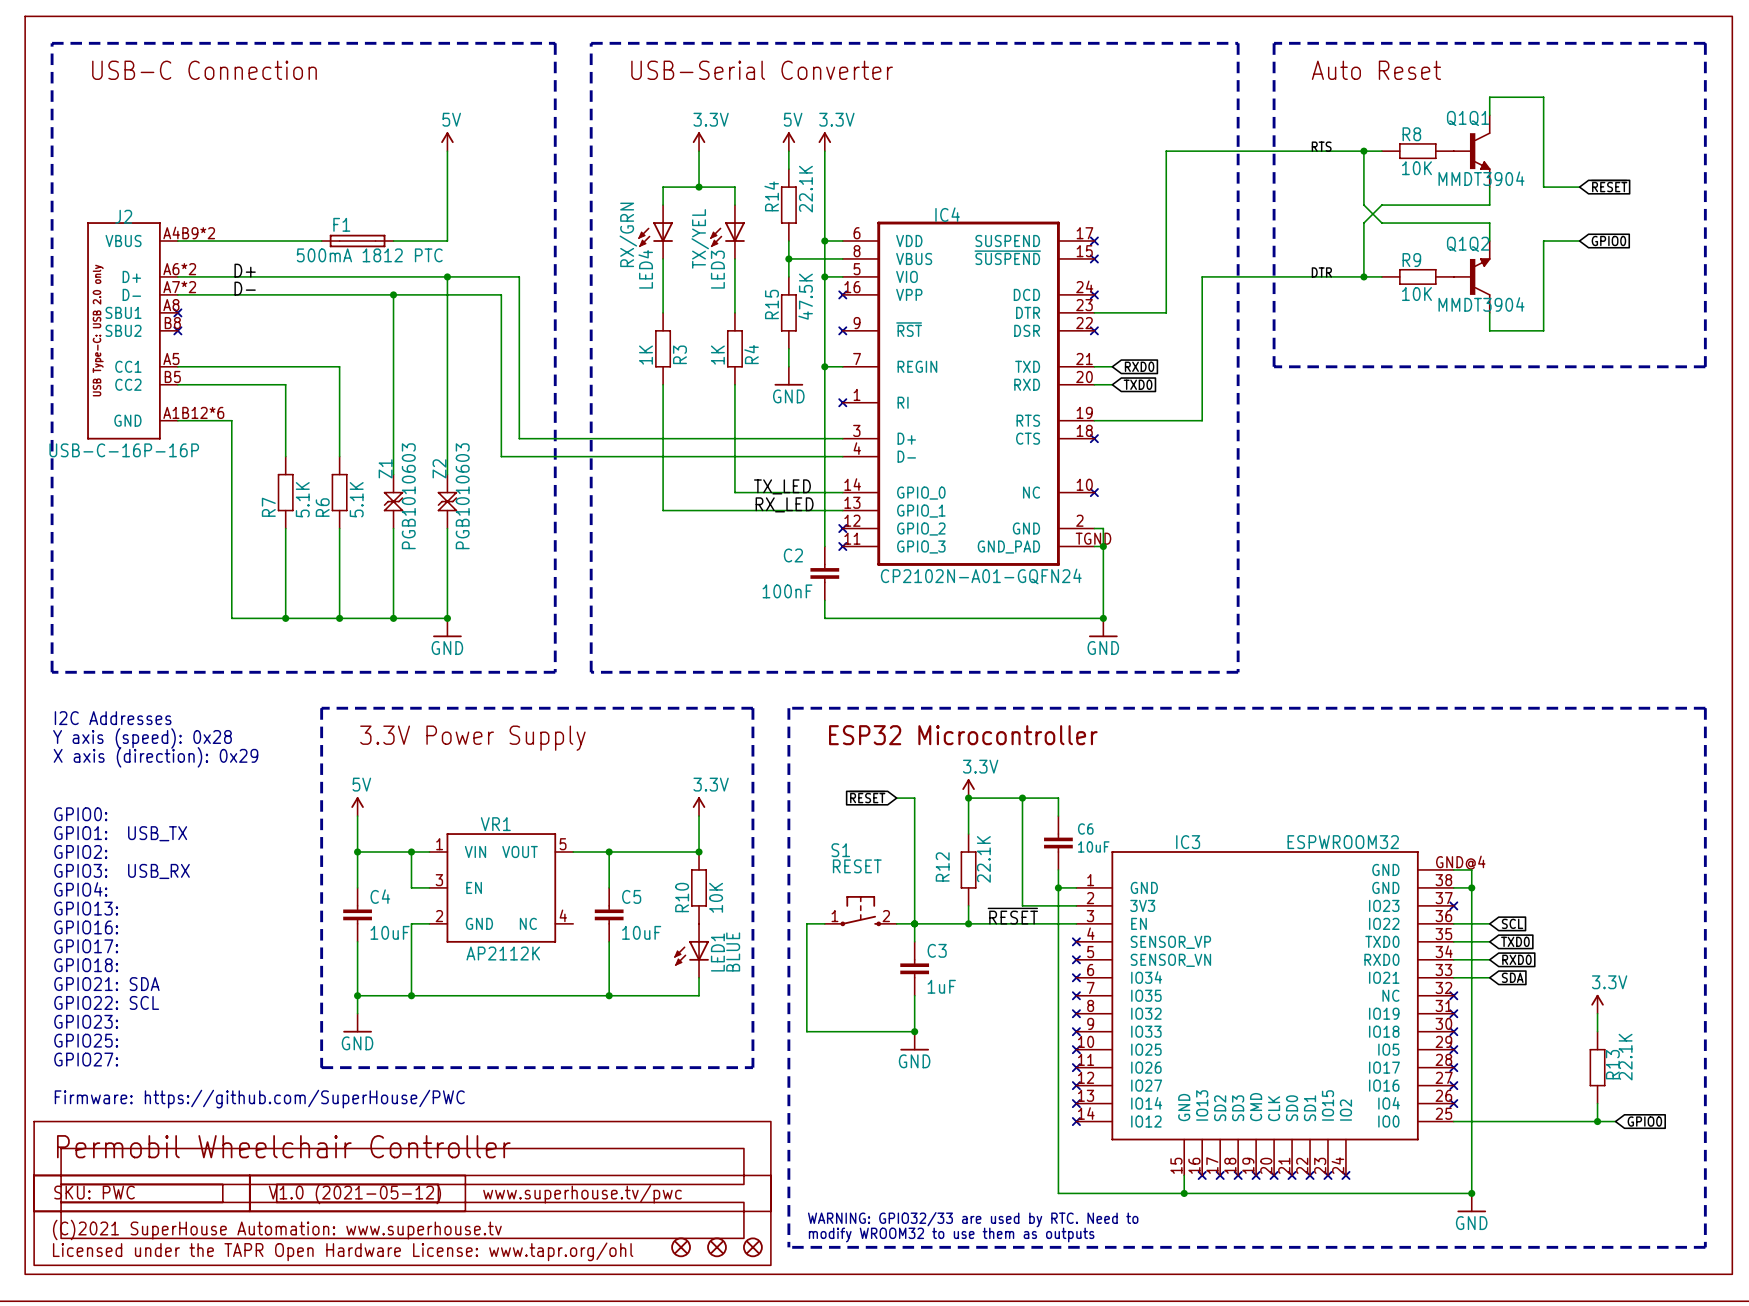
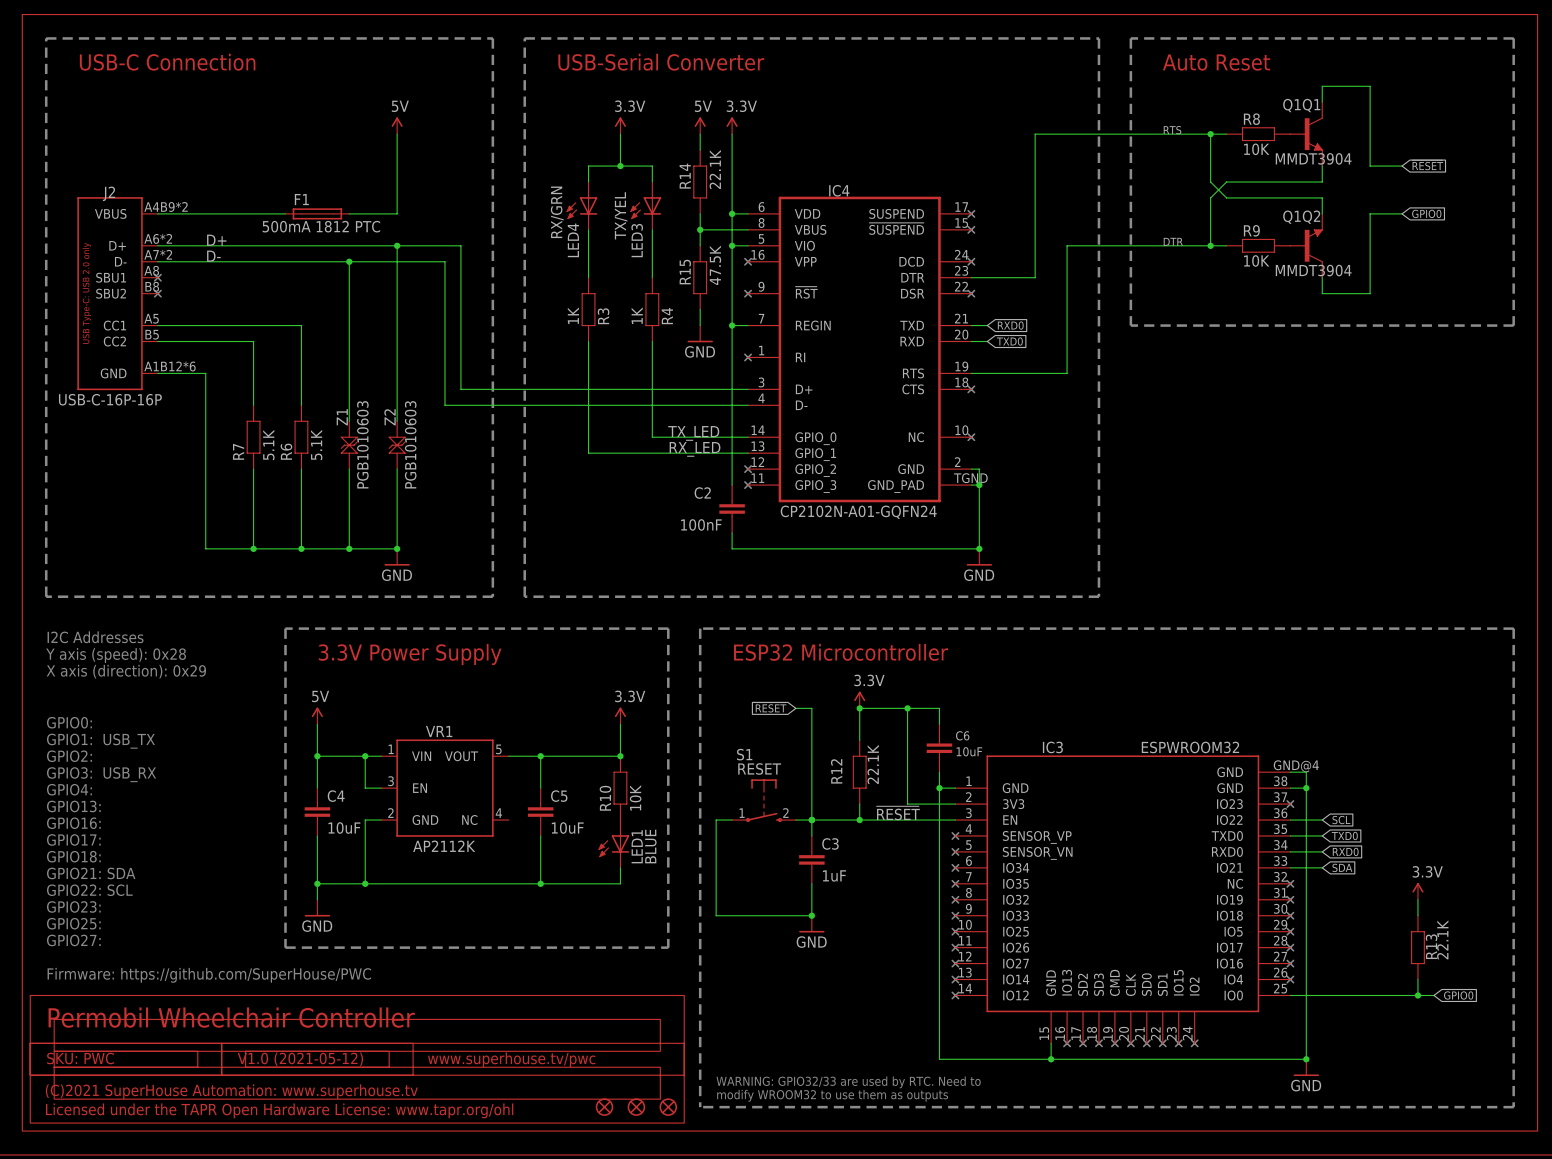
S1 symbol: [824, 896, 897, 927] -> [732, 779, 796, 823]

